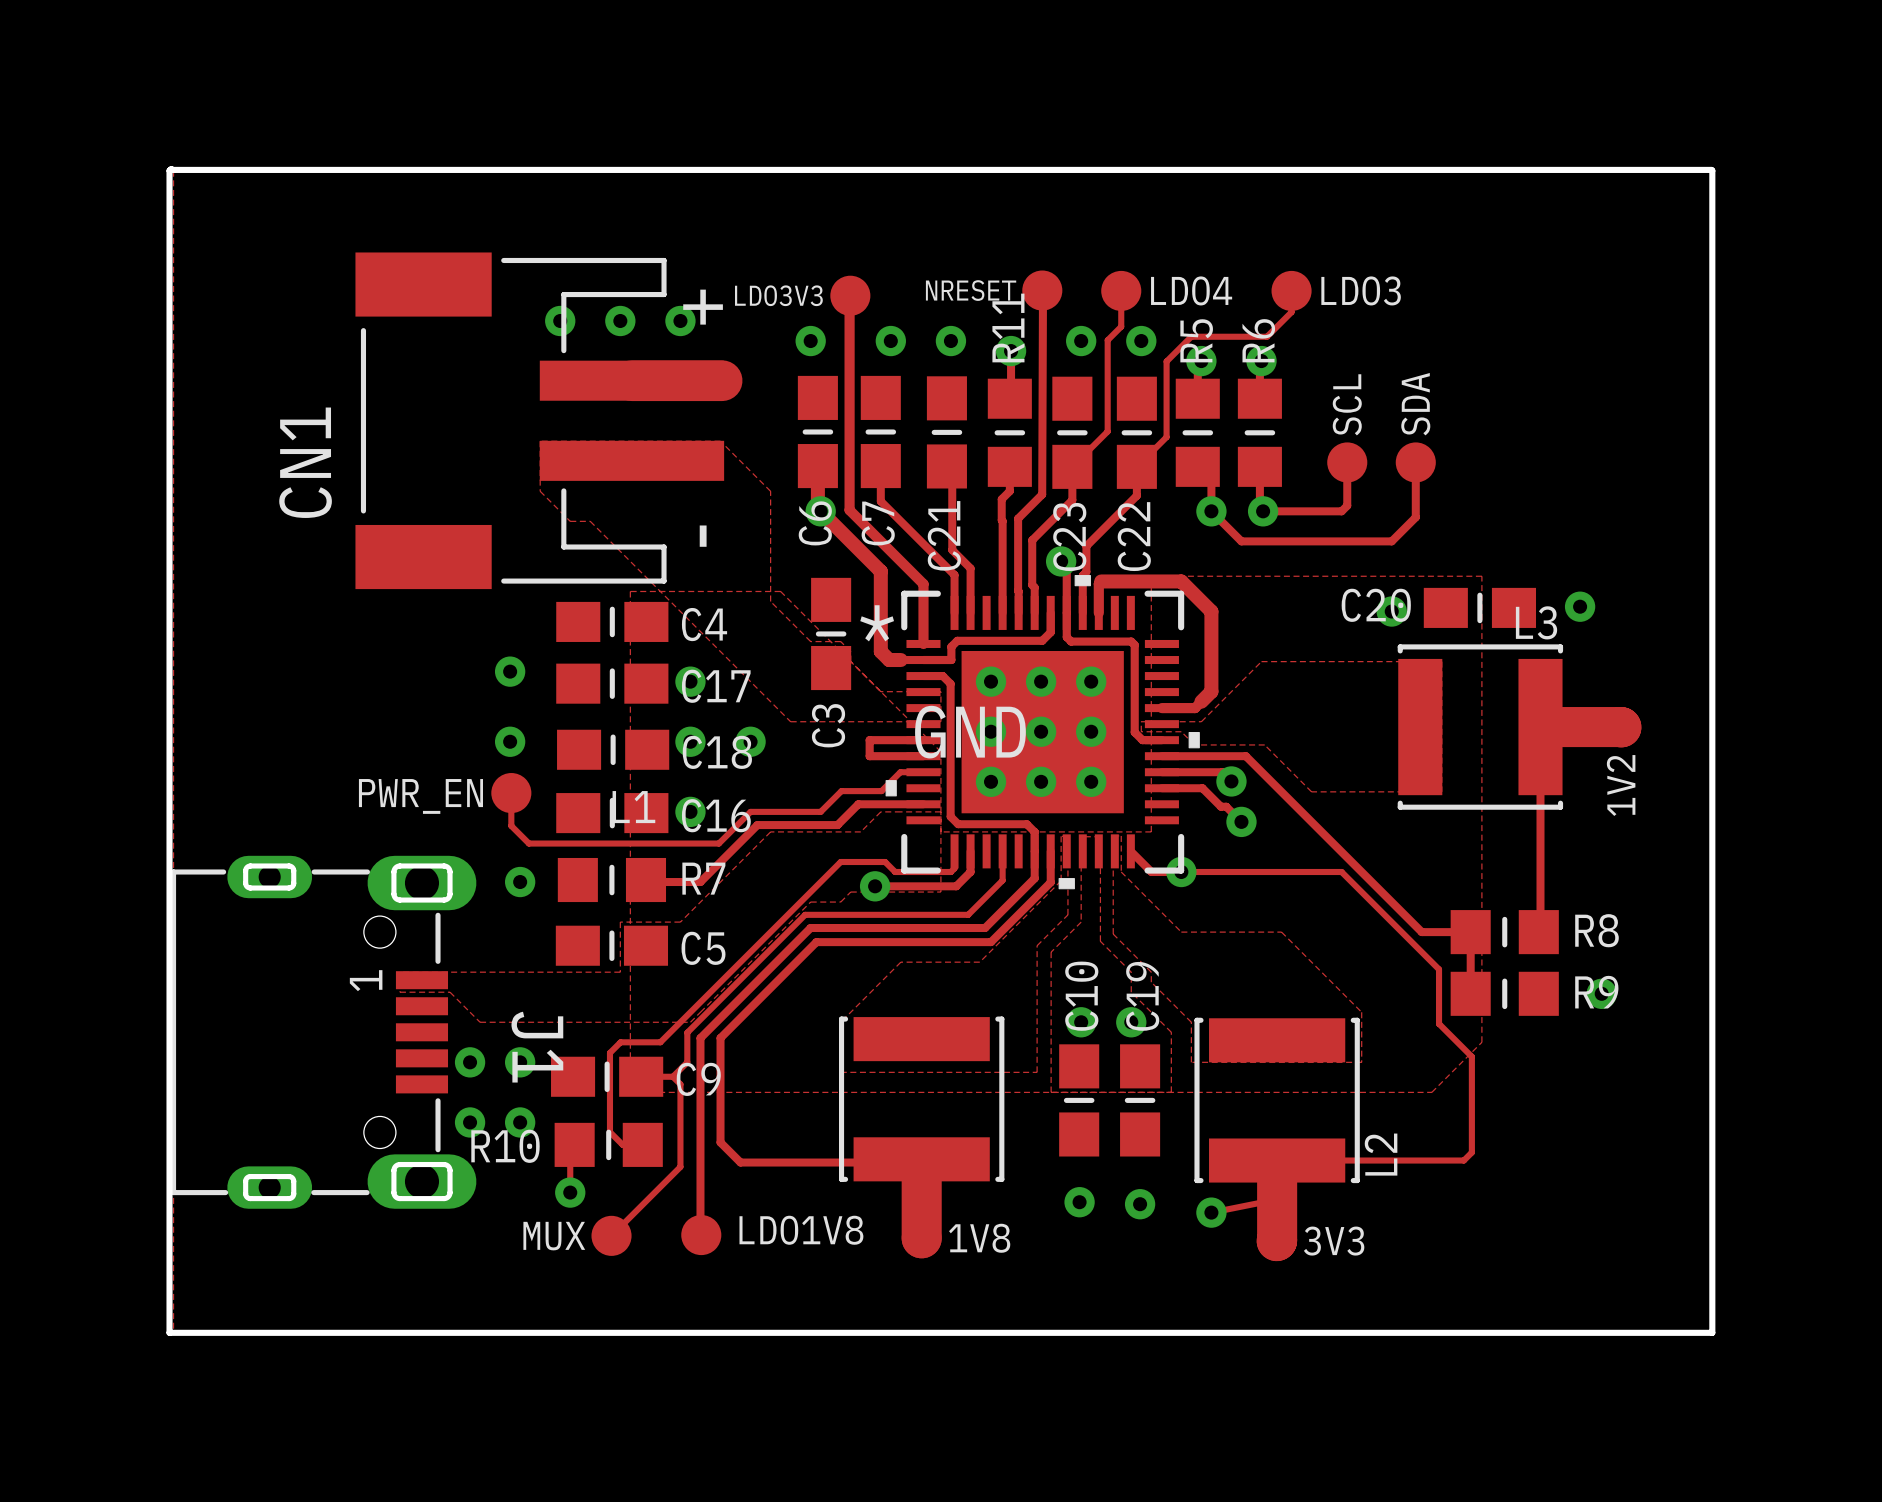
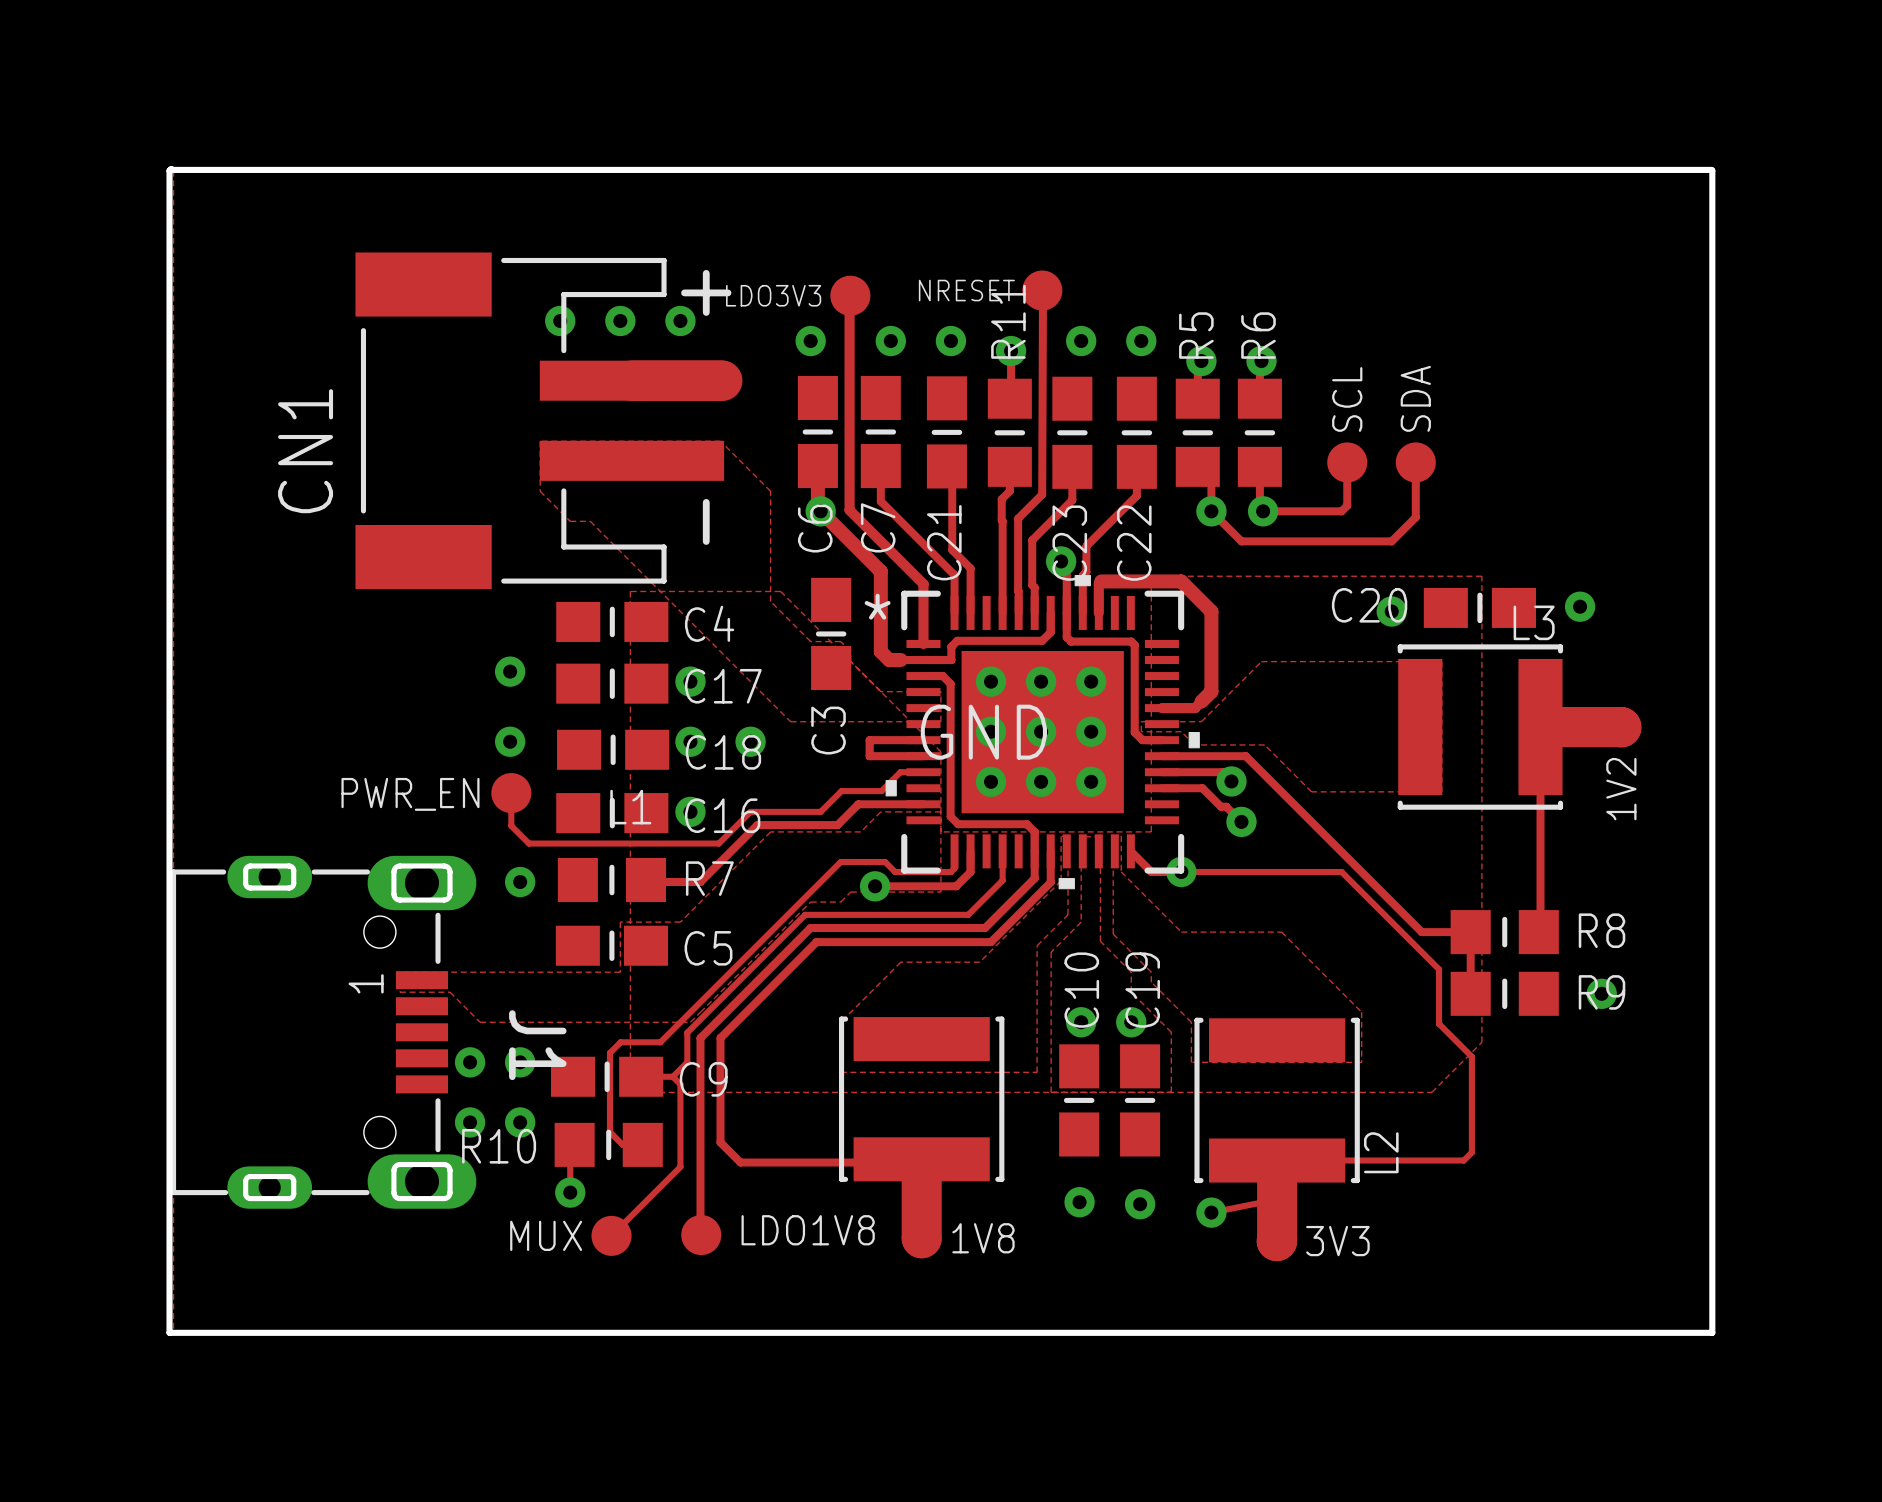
track: (1121, 290) (1121, 326) (1107, 340) (1107, 431) (1072, 466) -> none
LDO4: (1121, 290) -> none
track: (1291, 290) (1291, 312) (1266, 336) (1191, 336) (1166, 361) (1166, 437) (1136, 466) -> none
LDO3: (1291, 290) -> none

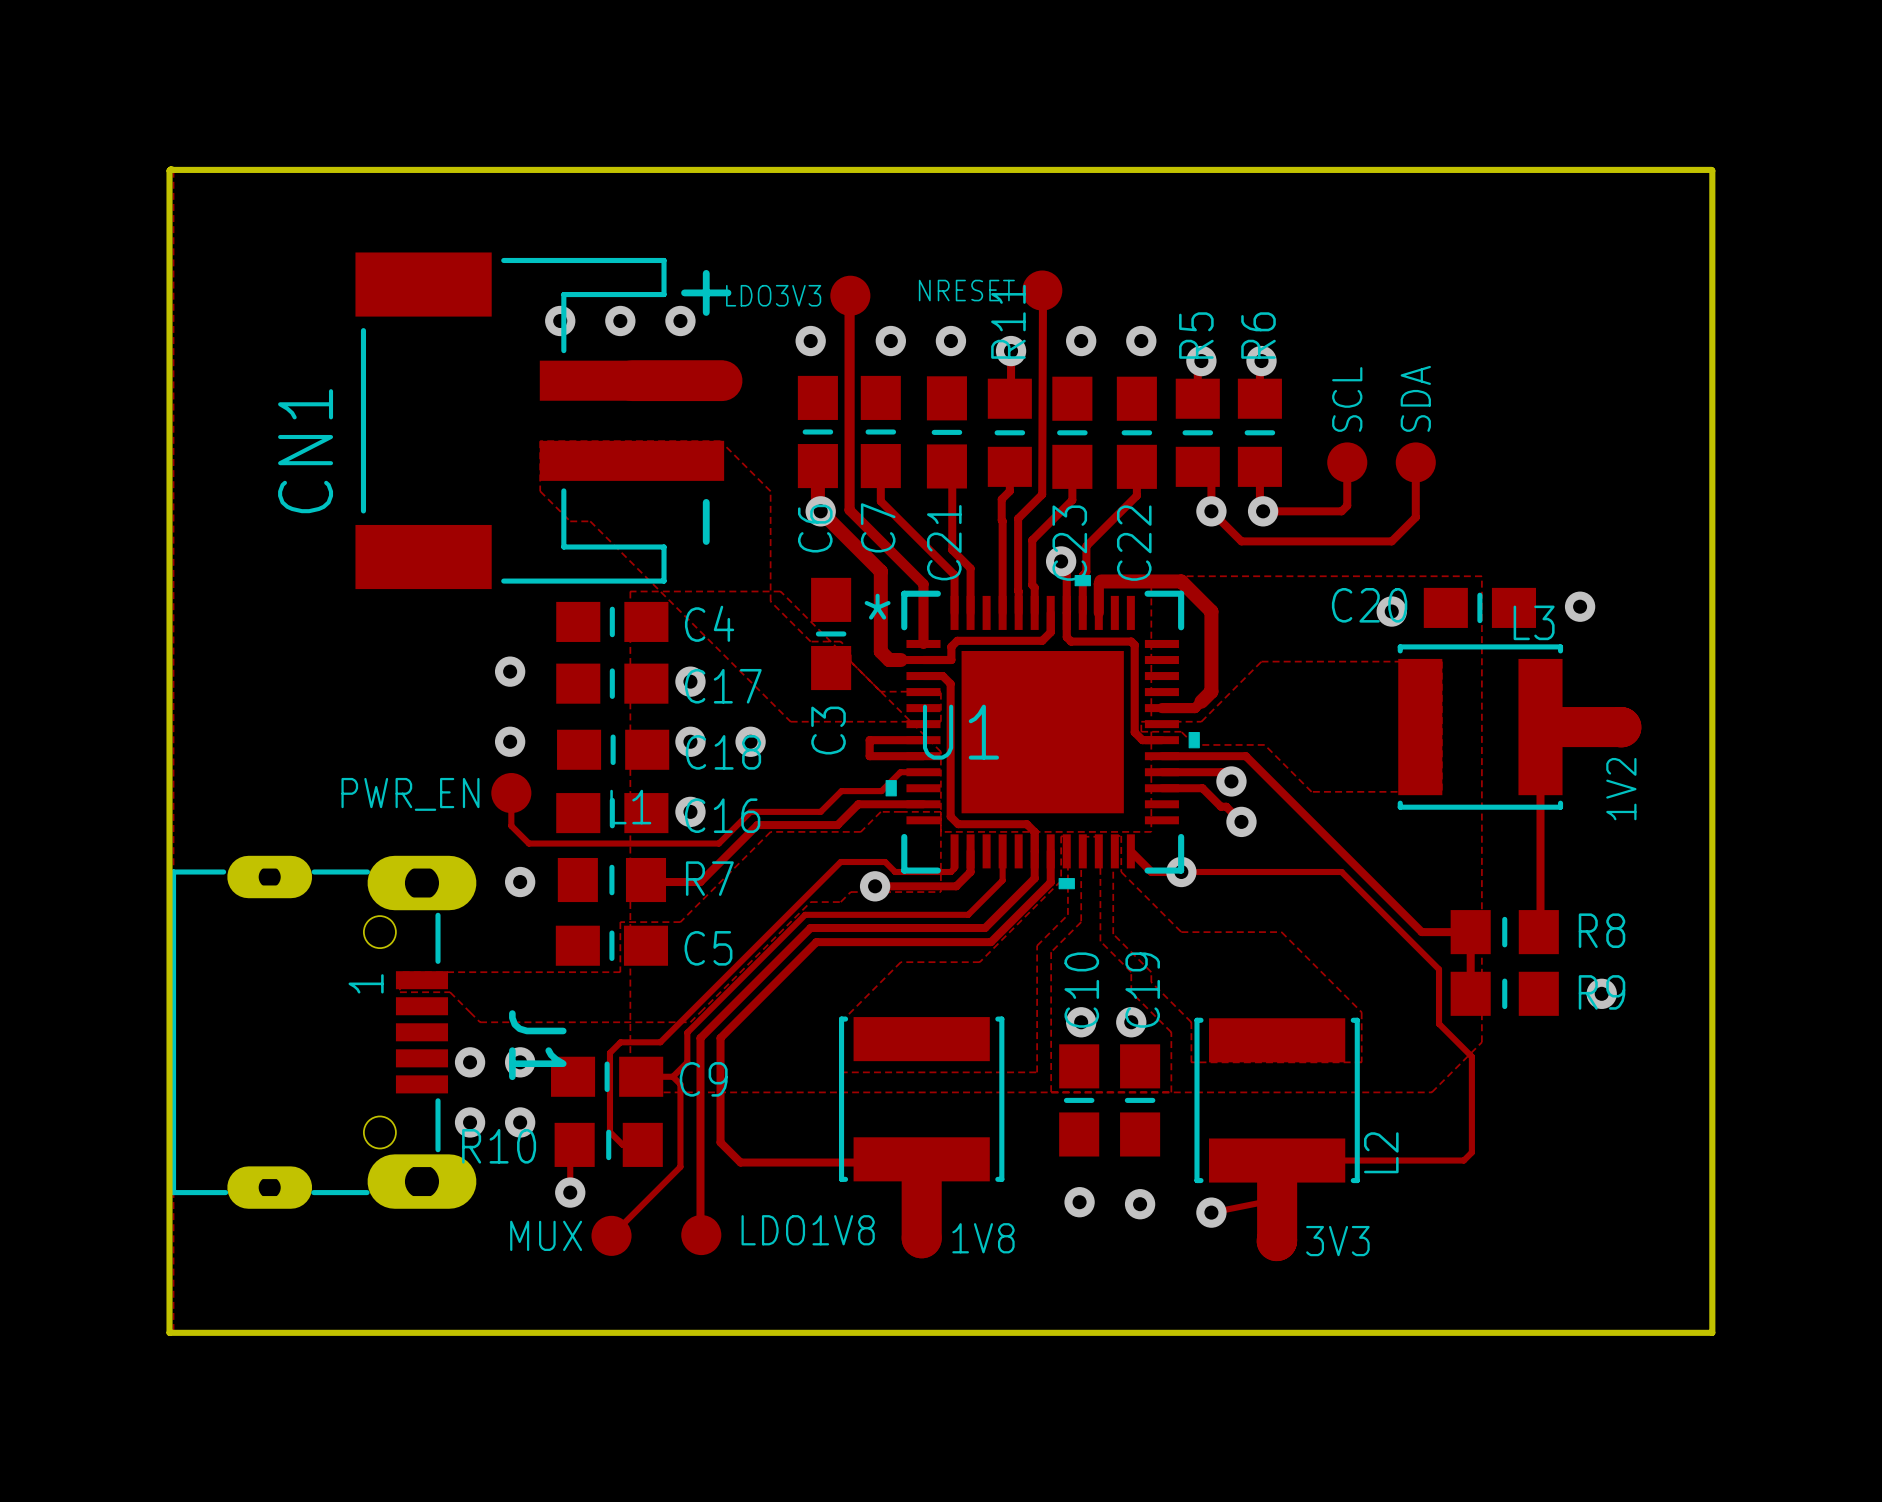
via: (991, 681) -> none
via: (1041, 681) -> none
via: (1091, 681) -> none
via: (991, 731) -> none
via: (1041, 731) -> none
via: (1091, 731) -> none
GND name: GND (983, 732) -> U1 (960, 732)
via: (991, 781) -> none
via: (1041, 781) -> none
via: (1091, 781) -> none

